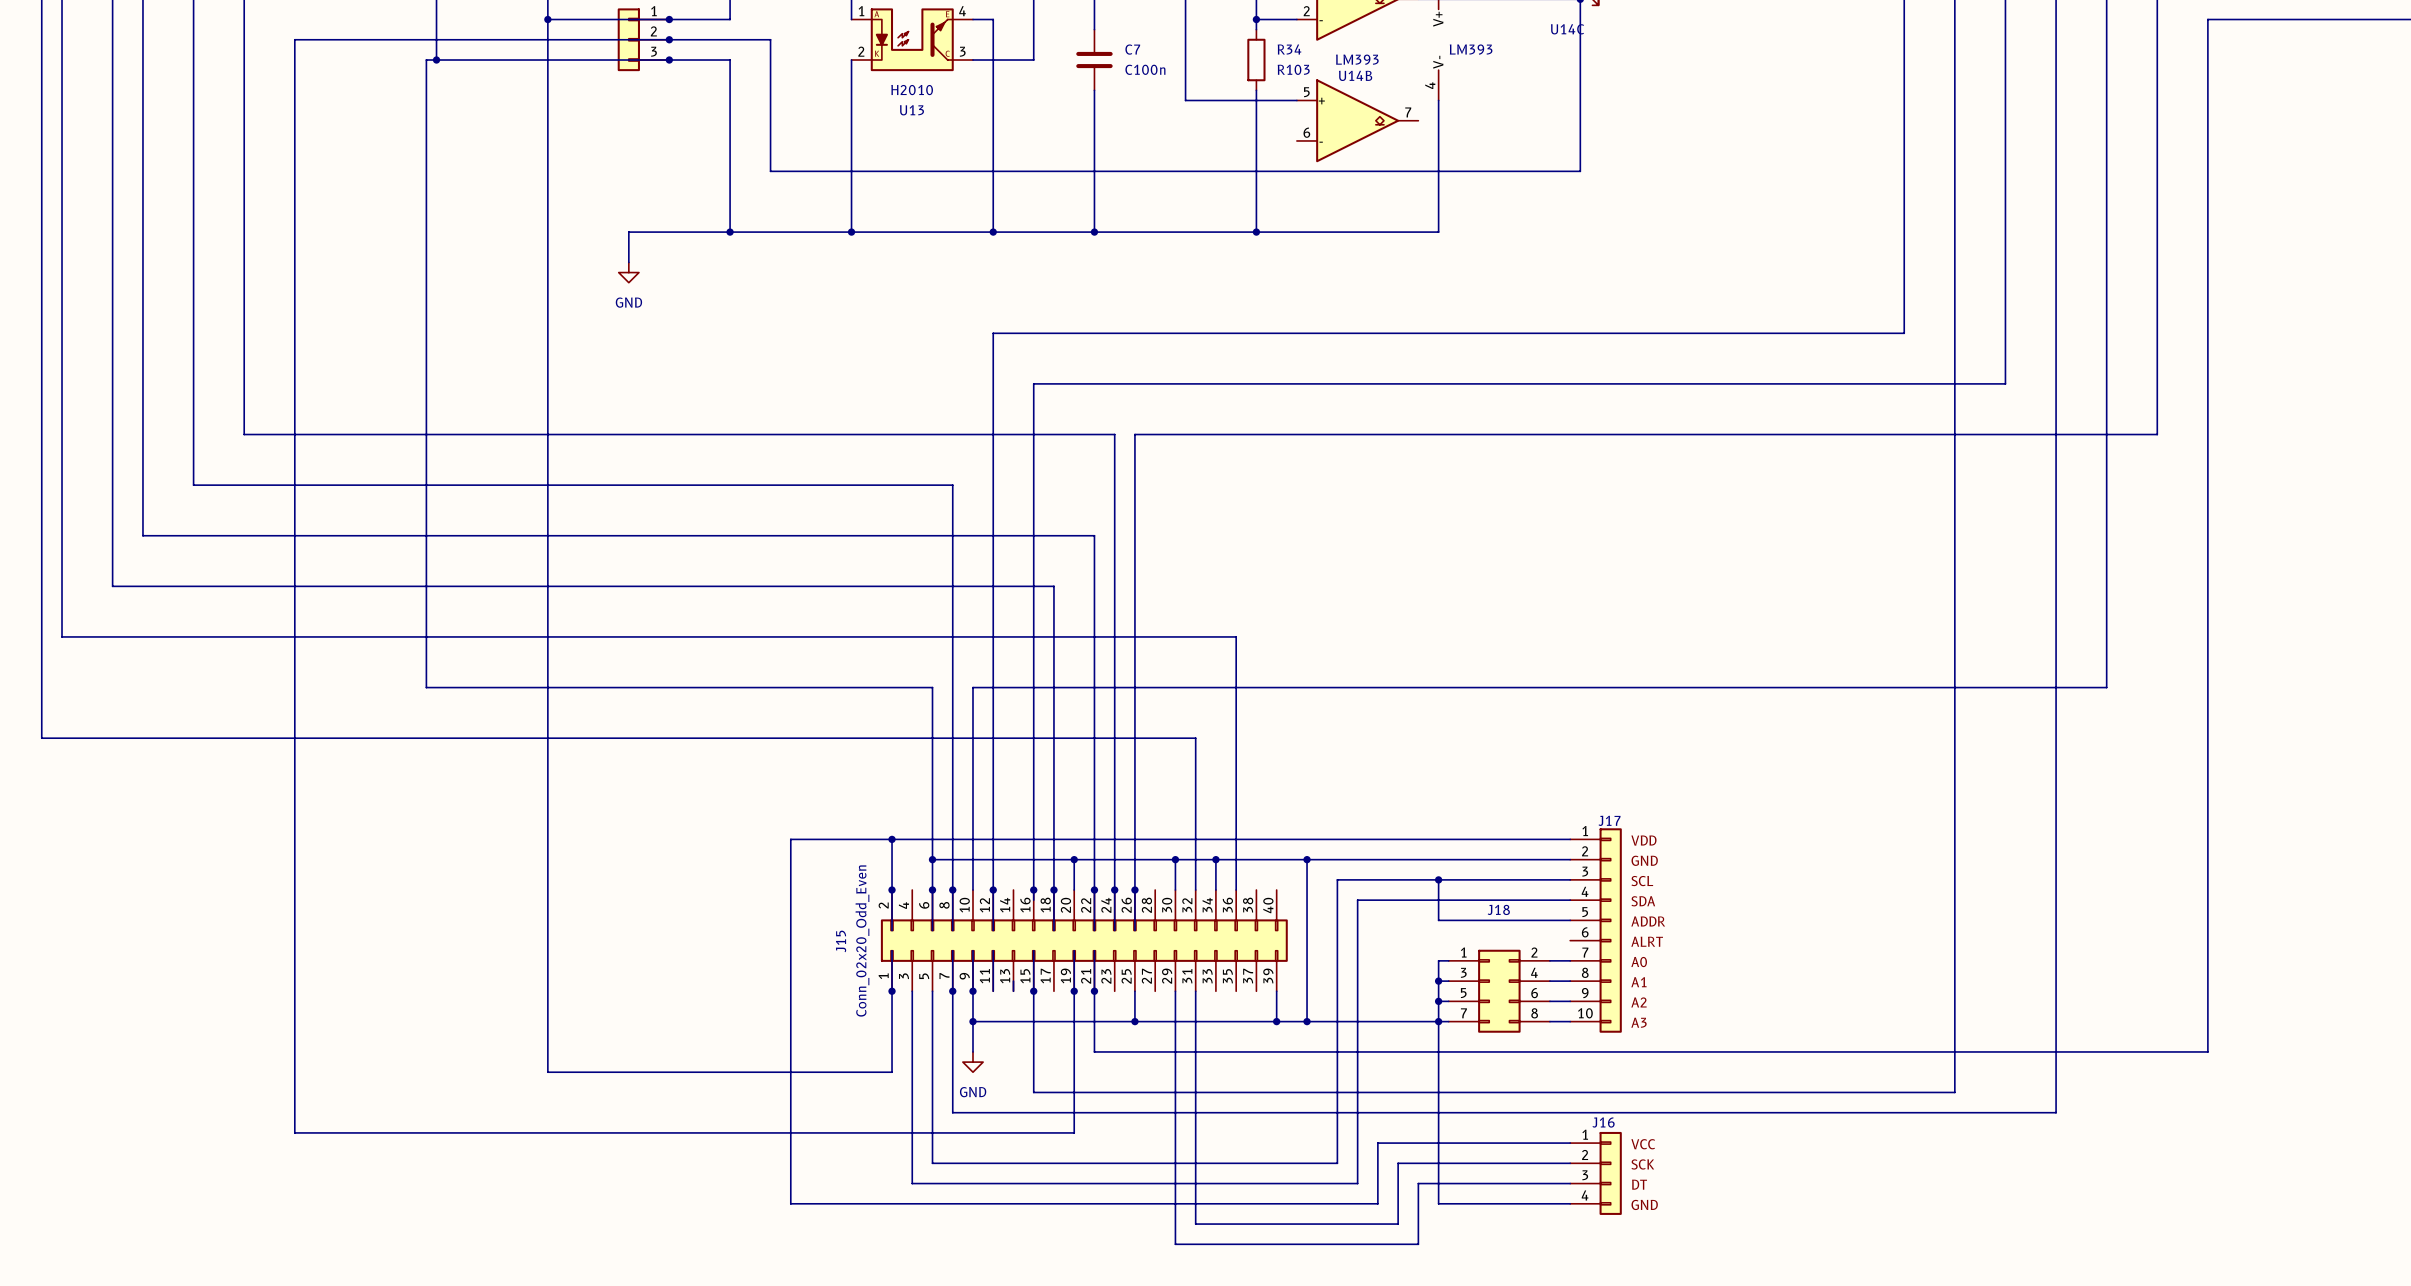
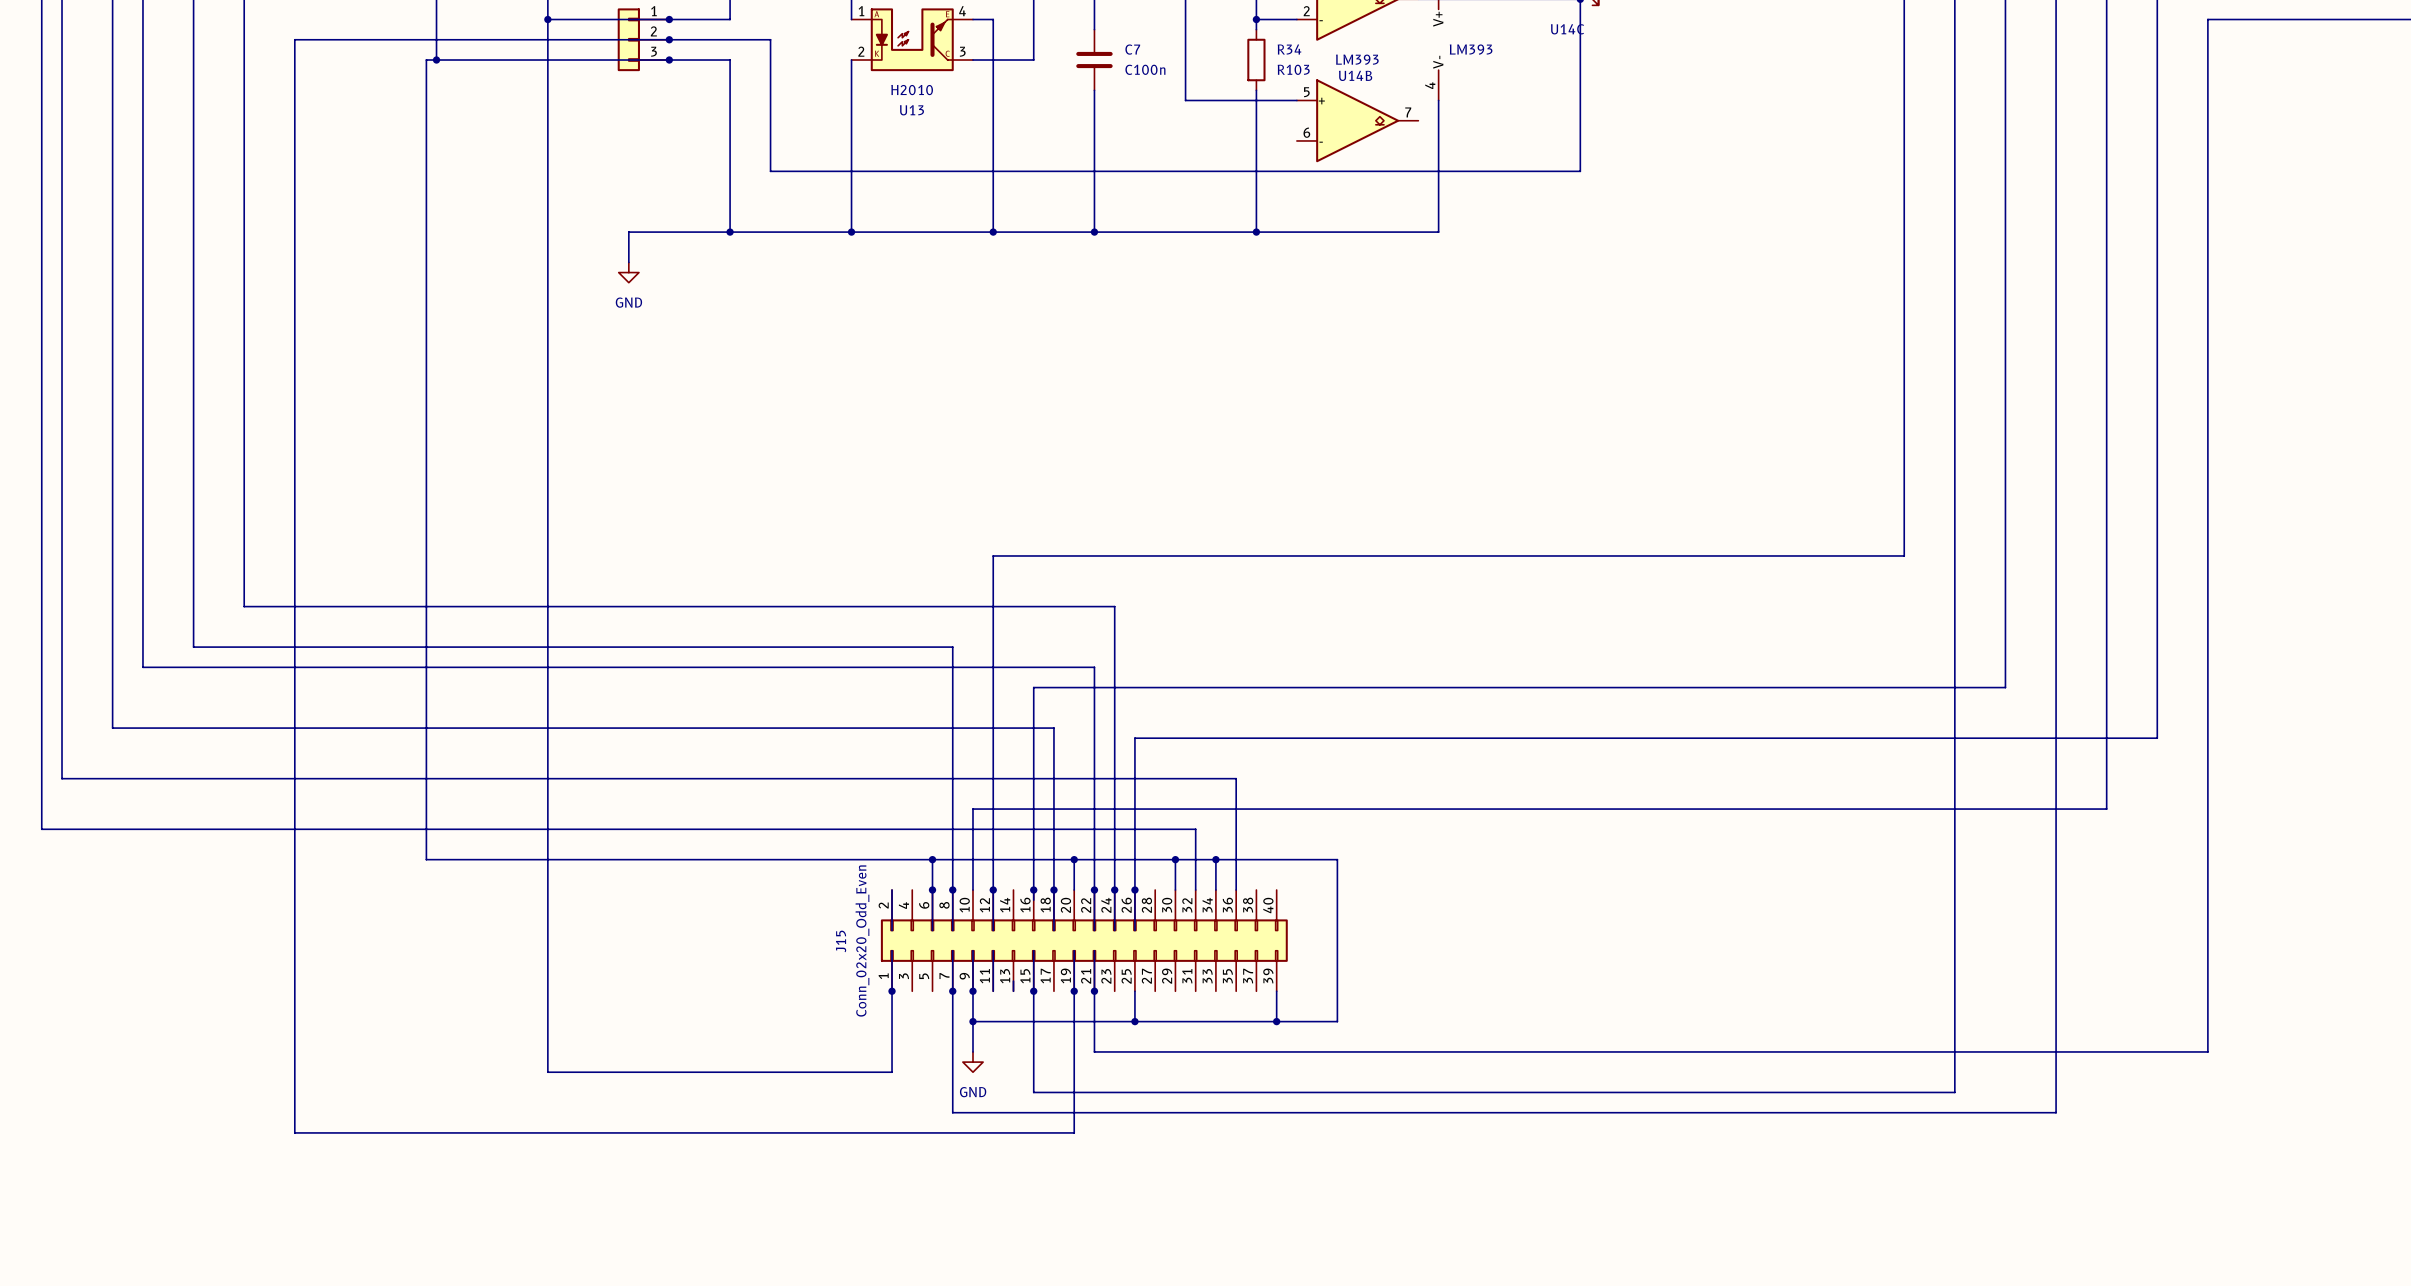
wire: (1904, 333) (993, 333) (993, 555) -> (1904, 333) (1904, 555) (993, 555)
wire: (2005, 383) (1033, 383) (1033, 687) (972, 687) (972, 809) -> (2106, 687) (2106, 809) (972, 809)
wire: (244, 434) (1114, 434) (1114, 606) -> (244, 434) (244, 606) (1114, 606)
wire: (2157, 434) (1134, 434) (1134, 738) (41, 738) -> (1195, 829) (41, 829) (41, 738)
wire: (193, 485) (952, 485) (952, 647) -> (193, 485) (193, 647) (952, 647)
wire: (142, 535) (1094, 535) (1094, 667) -> (142, 535) (142, 667) (1094, 667)
wire: (112, 586) (1053, 586) (1053, 728) -> (112, 586) (112, 728) (1053, 728)
wire: (62, 636) (1236, 636) (1236, 778) -> (62, 636) (62, 778) (1236, 778)
wire: (426, 687) (932, 687) (932, 859) -> (426, 687) (426, 859) (932, 859)
wire: (2005, 687) (2106, 687) -> (2005, 687) (2005, 383)
wire: (1195, 738) (1195, 829) -> (1195, 738) (2157, 738) (2157, 434)
wire: (892, 839) (892, 890) -> none
junction: (892, 839) -> none
wire: (1570, 839) (790, 839) (790, 1203) (1377, 1203) (1377, 1143) (1570, 1143) -> none
label: VDD (1643, 840) -> none
wire: (1307, 859) (1307, 1021) -> none
junction: (1307, 859) -> none
wire: (1337, 859) (1570, 859) -> (1337, 859) (1337, 879)
label: GND (1644, 860) -> none
wire: (1337, 879) (1570, 879) -> none
wire: (1438, 879) (1438, 920) (1570, 920) -> none
junction: (1438, 879) -> none
label: SCL (1642, 881) -> none
junction: (892, 890) -> none
wire: (1570, 900) (1357, 900) (1357, 1183) (912, 1183) (912, 991) -> none
label: SDA (1643, 901) -> none
label: ADDR (1648, 921) -> none
J17: (1596, 930) -> none
label: ALRT (1647, 941) -> none
wire: (1448, 960) (1438, 960) (1438, 1203) (1570, 1203) -> none
wire: (1549, 960) (1570, 960) -> none
label: A0 (1639, 962) -> none
wire: (1438, 981) (1448, 981) -> none
junction: (1438, 981) -> none
wire: (1549, 981) (1570, 981) -> none
label: A1 (1638, 982) -> none
wire: (932, 991) (932, 1163) (1337, 1163) (1337, 1021) (1448, 1021) -> none
wire: (1175, 991) (1175, 1244) (1418, 1244) (1418, 1183) (1570, 1183) -> none
wire: (1195, 991) (1195, 1224) (1398, 1224) (1398, 1163) (1570, 1163) -> none
J18: (1499, 991) -> none
wire: (1438, 1001) (1448, 1001) -> none
junction: (1438, 1001) -> none
wire: (1549, 1001) (1570, 1001) -> none
label: A2 (1638, 1002) -> none
junction: (1307, 1021) -> none
junction: (1438, 1021) -> none
wire: (1549, 1021) (1570, 1021) -> none
label: A3 (1638, 1022) -> none
label: VCC (1643, 1144) -> none
label: SCK (1642, 1164) -> none
J16: (1596, 1173) -> none
label: DT (1639, 1184) -> none
label: GND (1644, 1204) -> none

